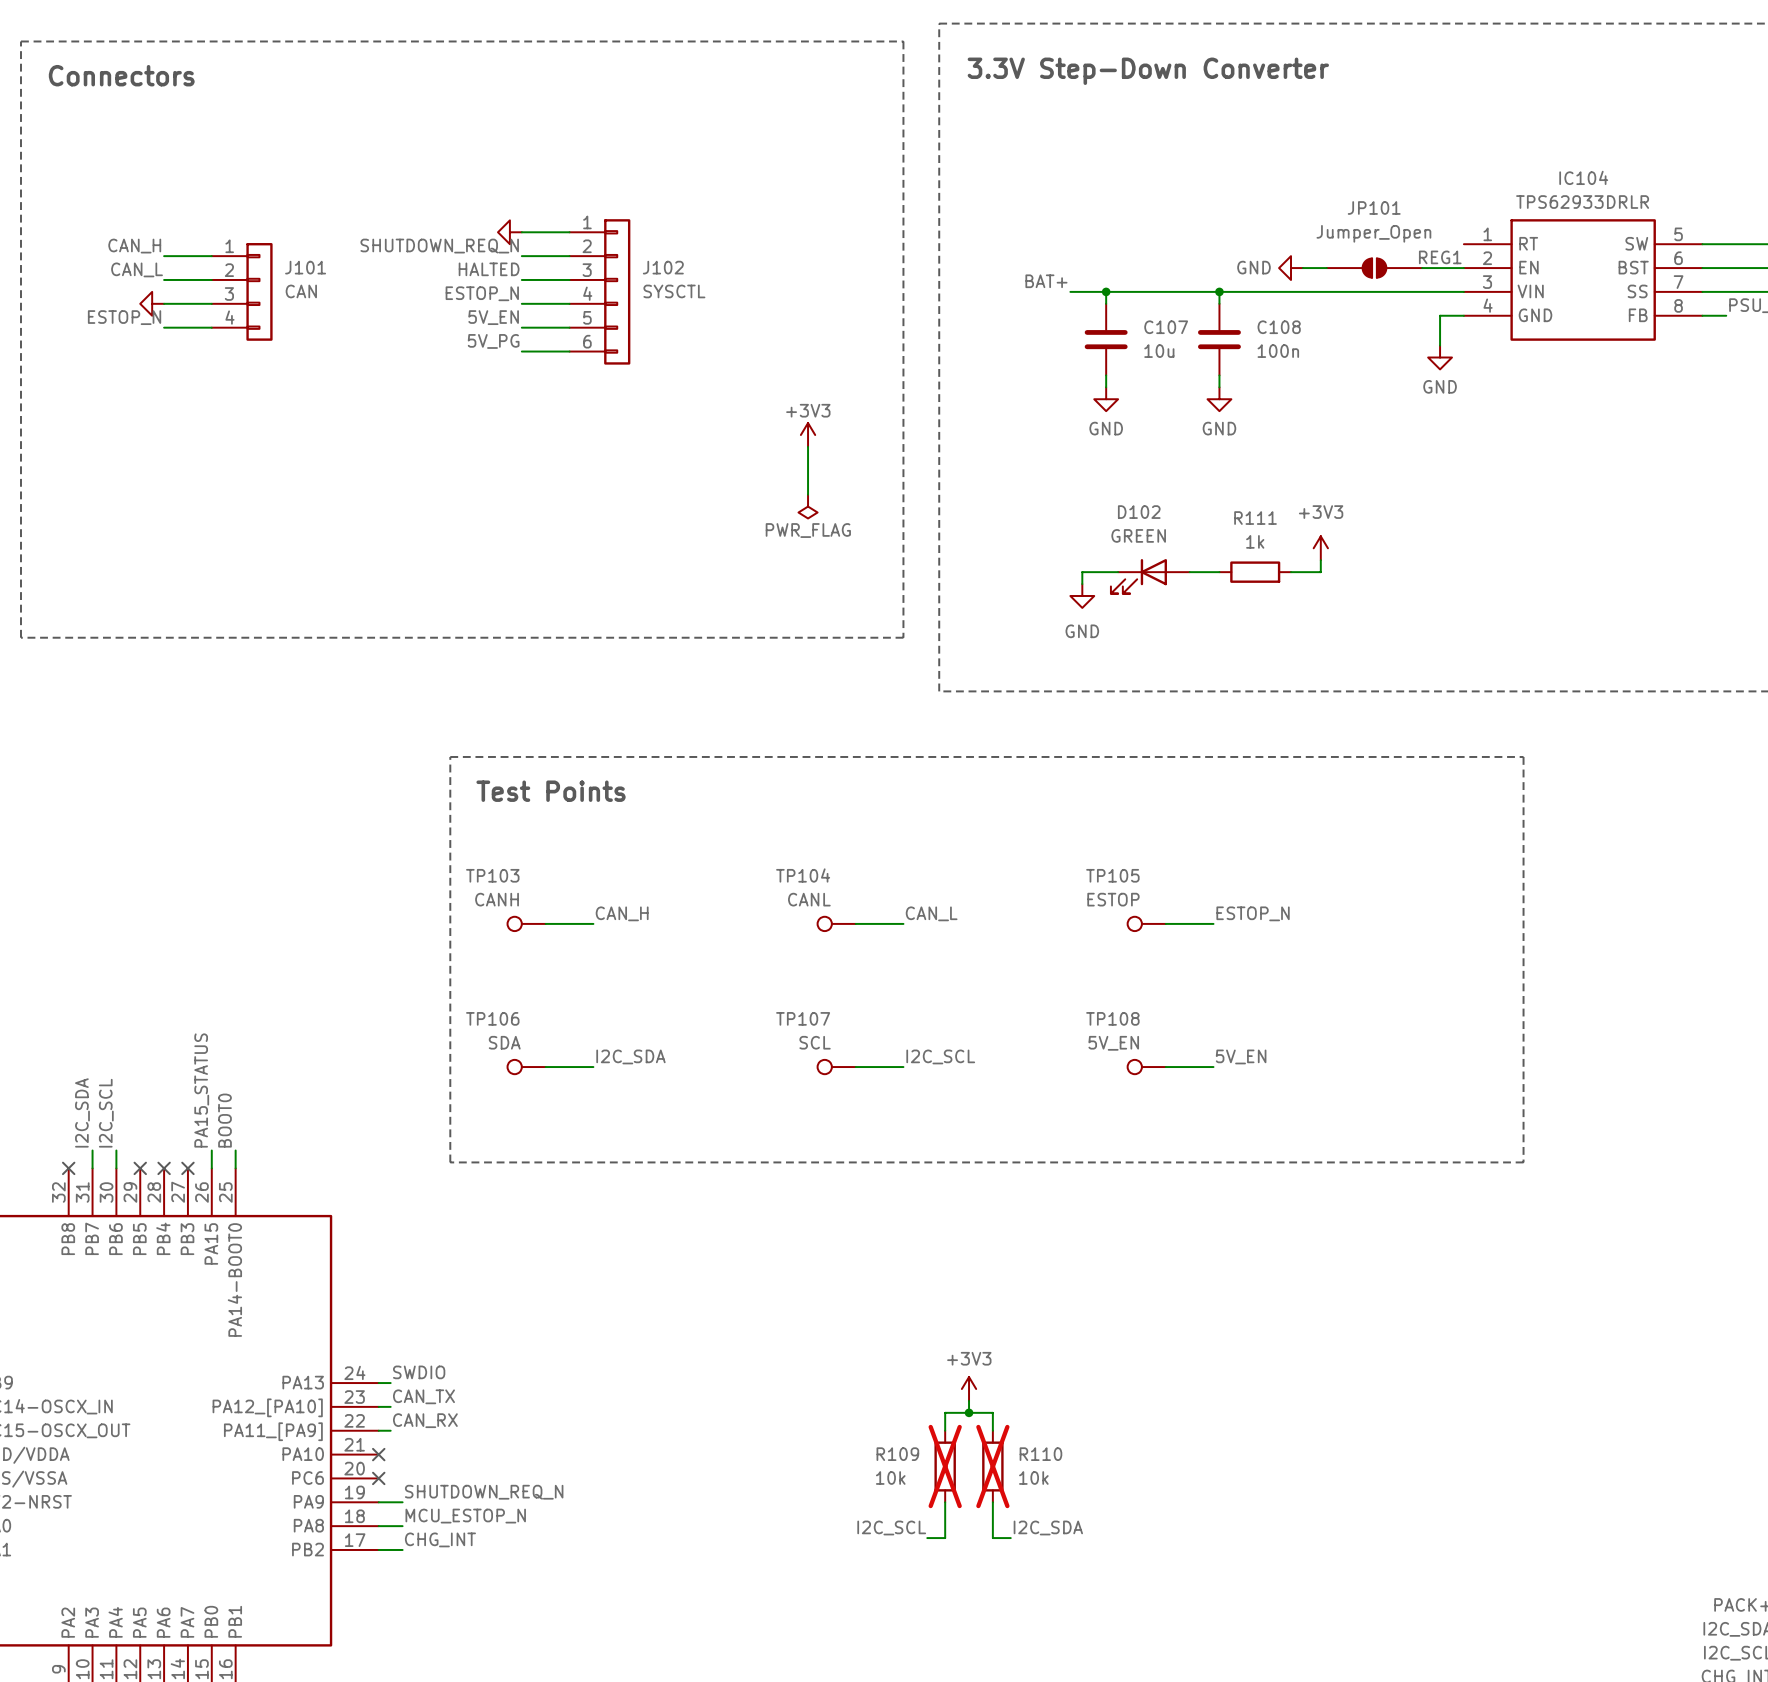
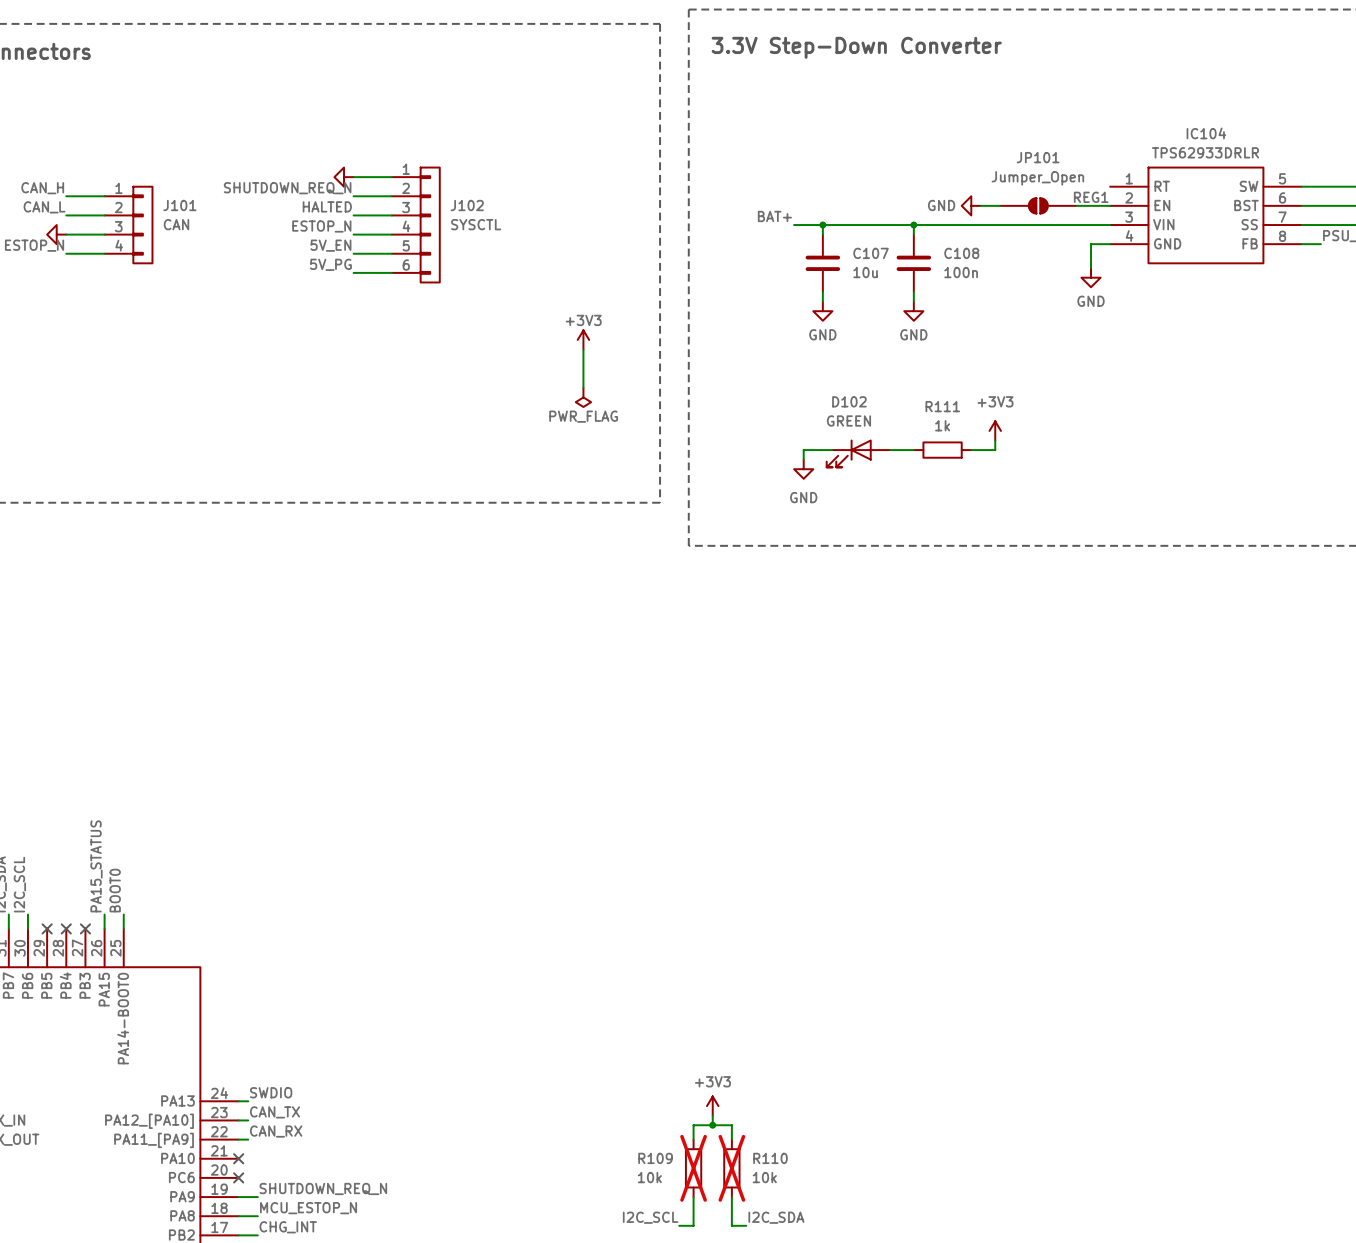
line: (450, 756) (1523, 756) (1523, 1162) (450, 1162) (450, 756) -> none
text: Test Points (551, 791) -> none
label: CAN_H (622, 913) -> none
label: CAN_L (931, 913) -> none
label: ESTOP_N (1253, 913) -> none
TP103: CANH (526, 923) -> none
wire: (545, 923) (593, 923) -> none
TP104: CANL (836, 923) -> none
wire: (855, 923) (903, 923) -> none
TP105: ESTOP (1146, 923) -> none
wire: (1165, 923) (1213, 923) -> none
label: I2C_SDA (630, 1056) -> none
label: I2C_SCL (940, 1056) -> none
label: 5V_EN (1241, 1056) -> none
TP106: SDA (526, 1067) -> none
wire: (545, 1067) (593, 1067) -> none
TP107: SCL (836, 1067) -> none
wire: (855, 1067) (903, 1067) -> none
TP108: 5V_EN (1146, 1067) -> none
wire: (1165, 1067) (1213, 1067) -> none

